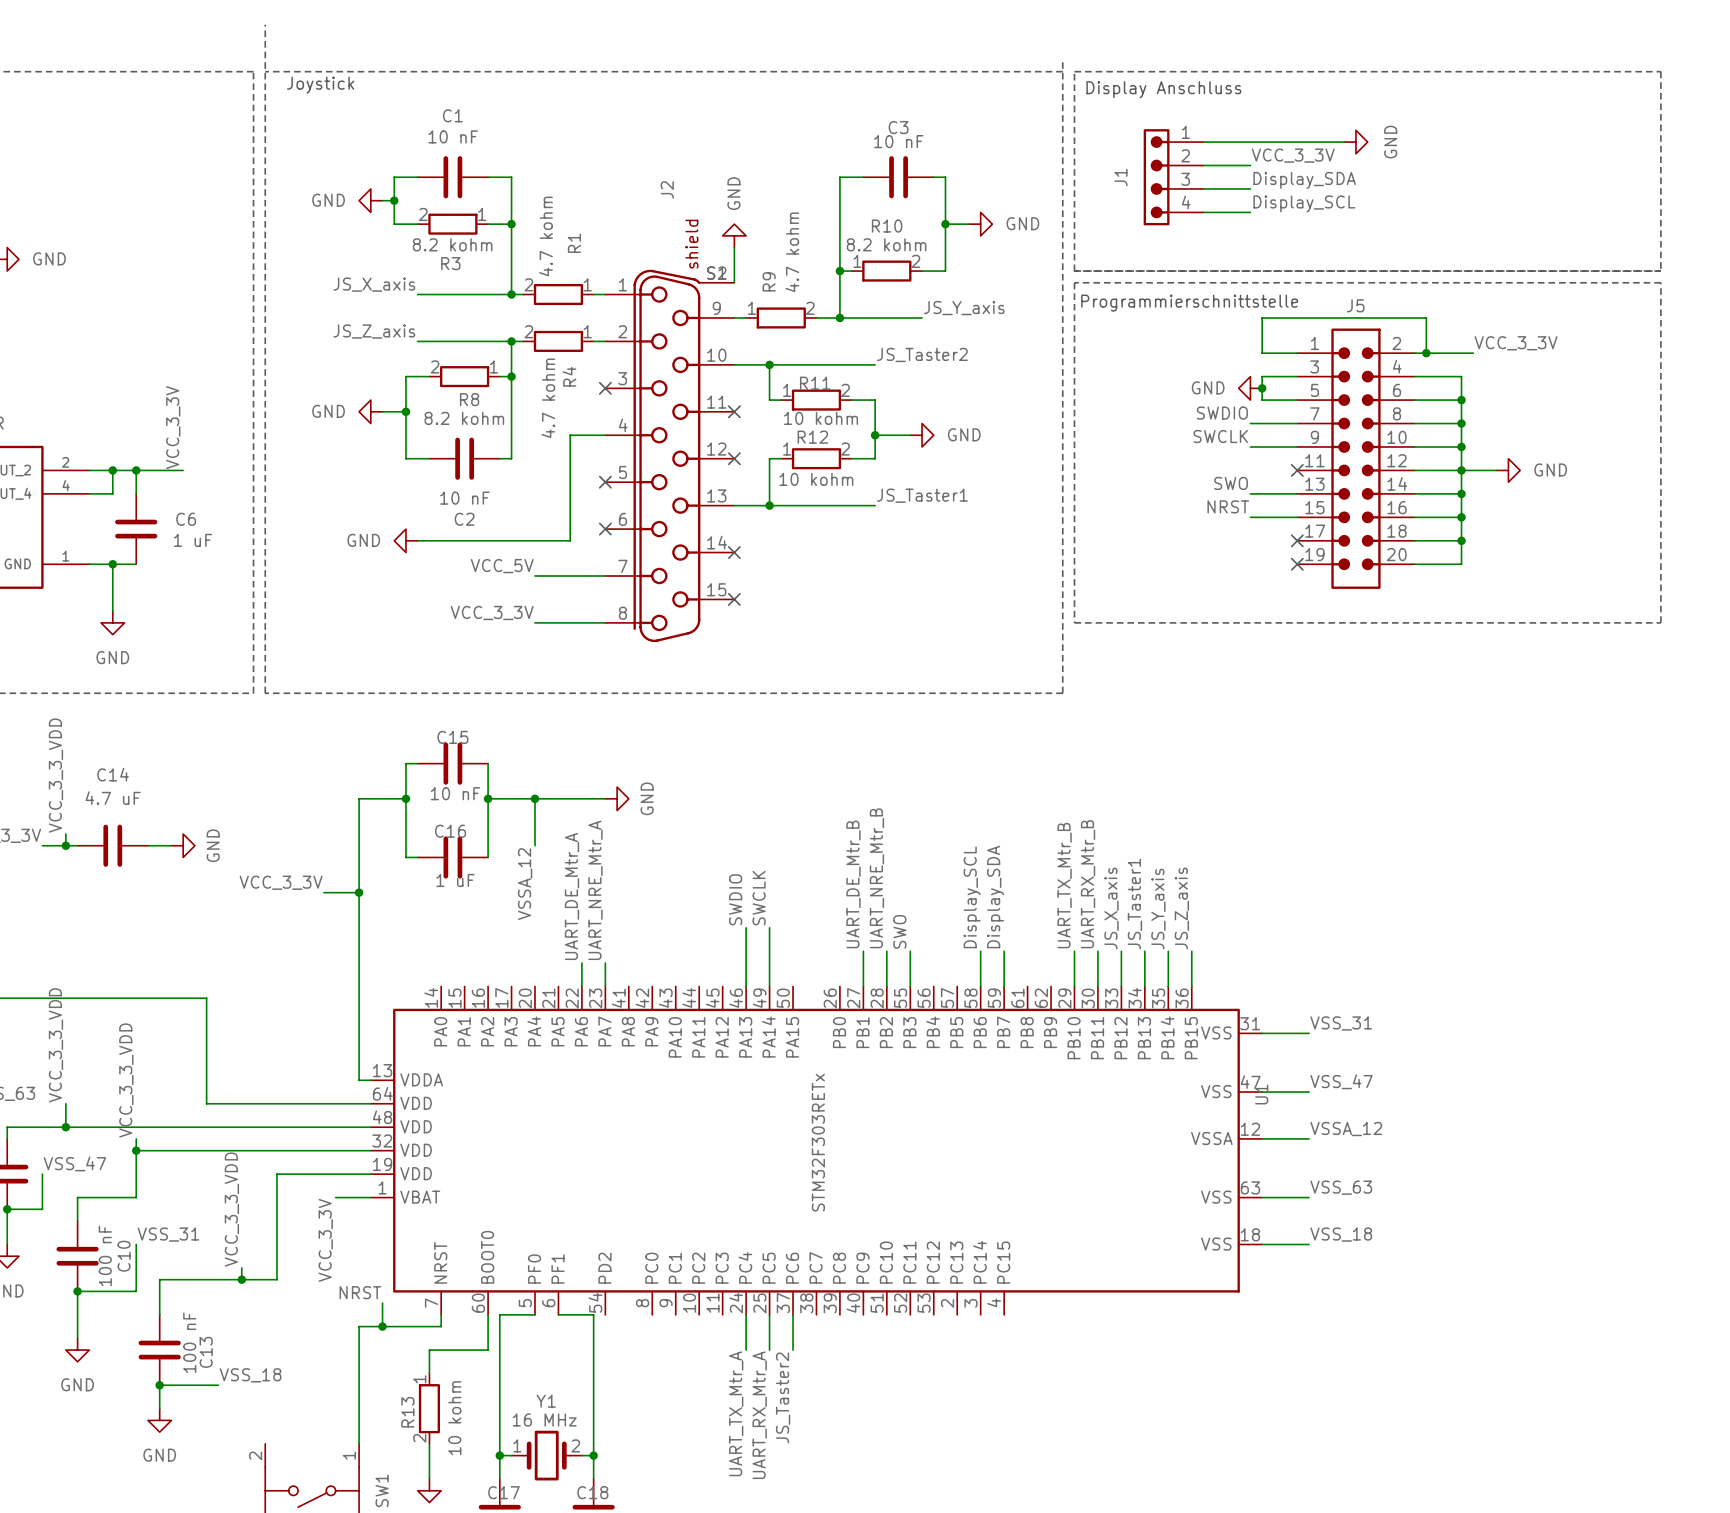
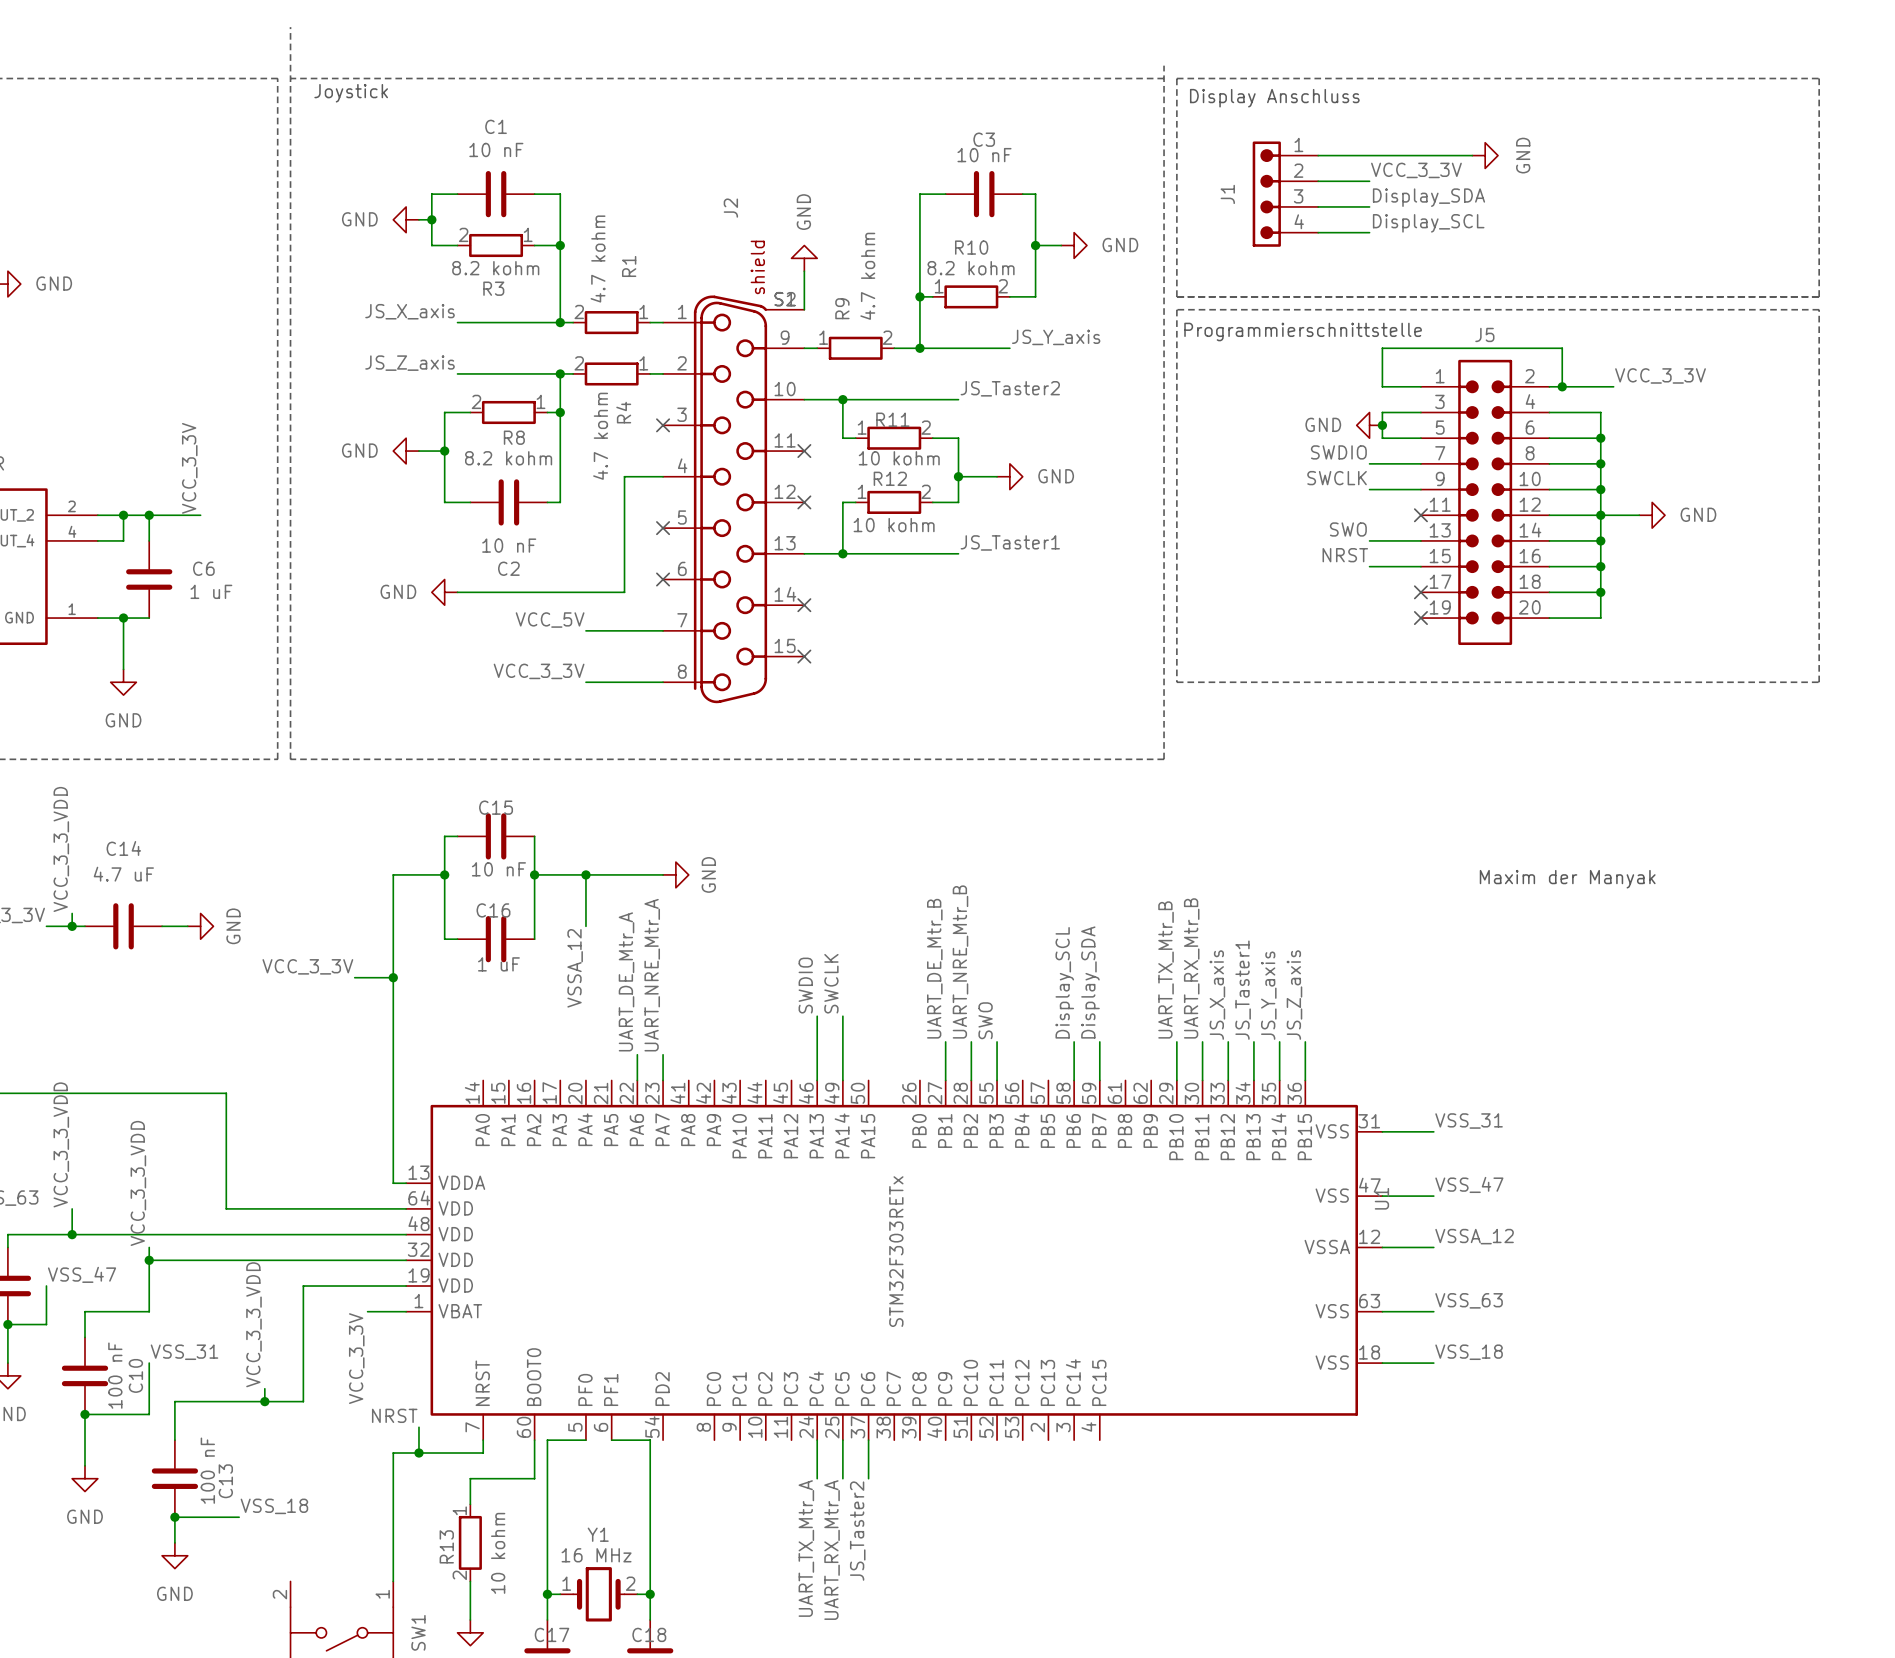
text: none -> Maxim der Manyak (1567, 879)

